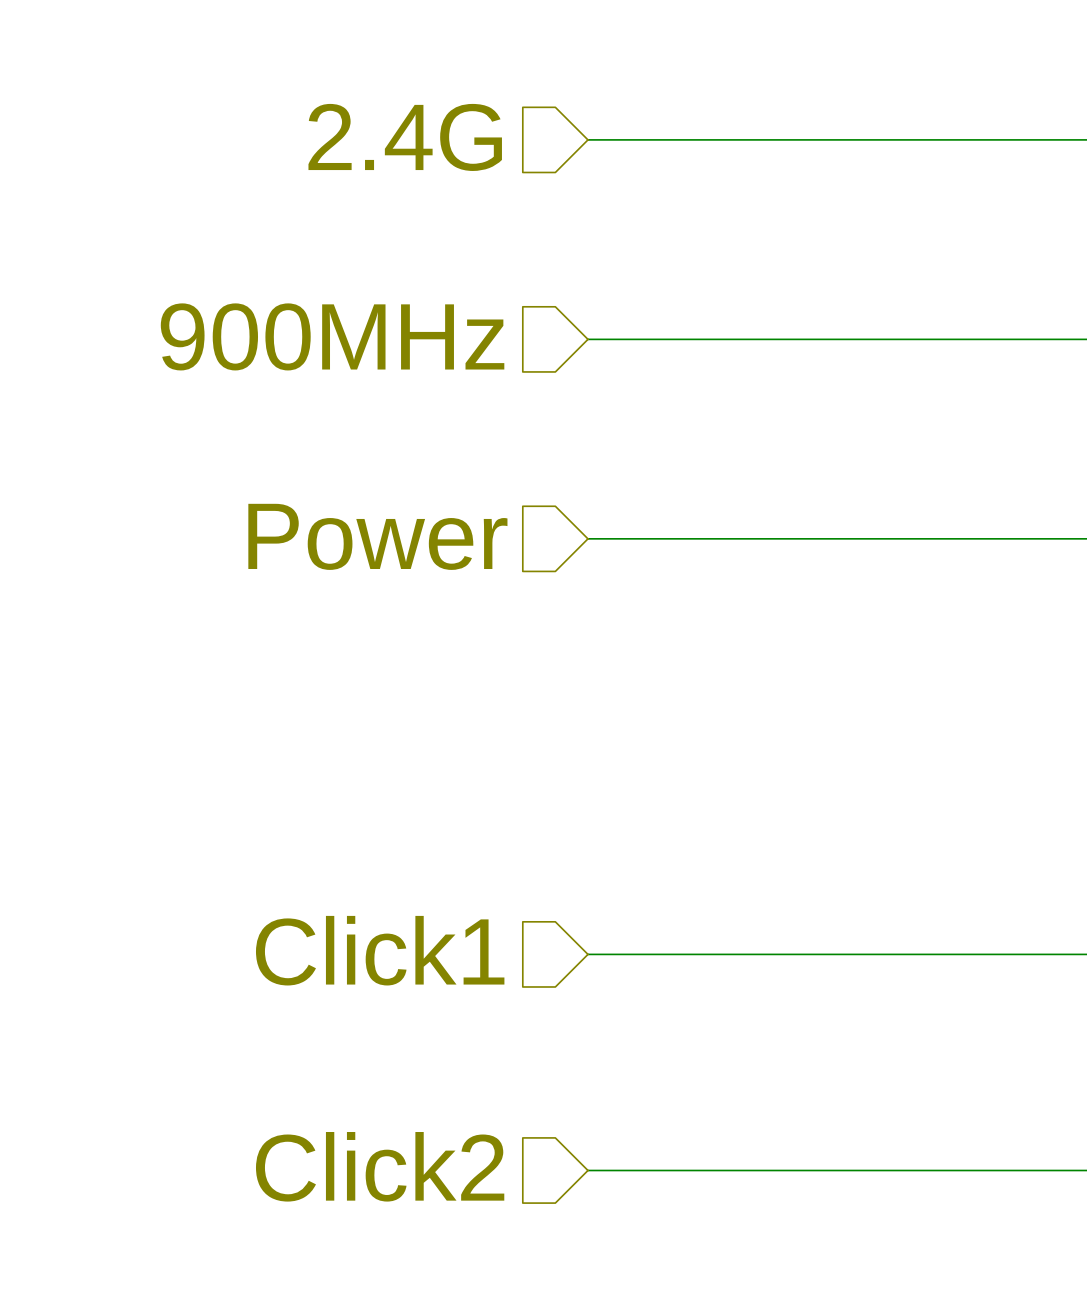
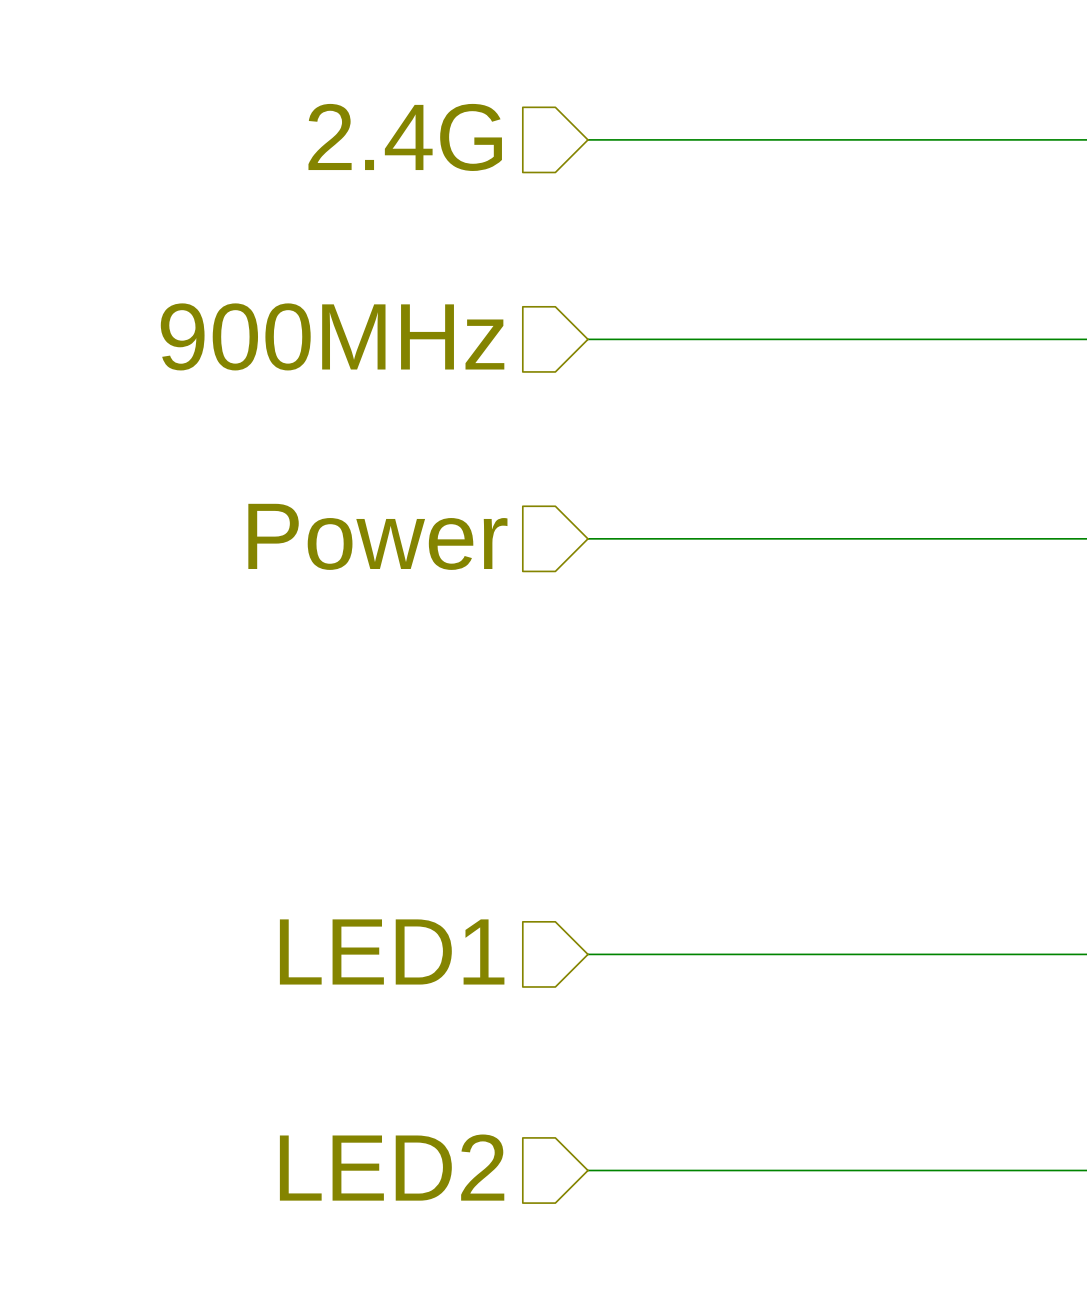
hierarchical label: Click1 (380, 950) -> LED1 (392, 951)
hierarchical label: Click2 (380, 1166) -> LED2 (392, 1167)

